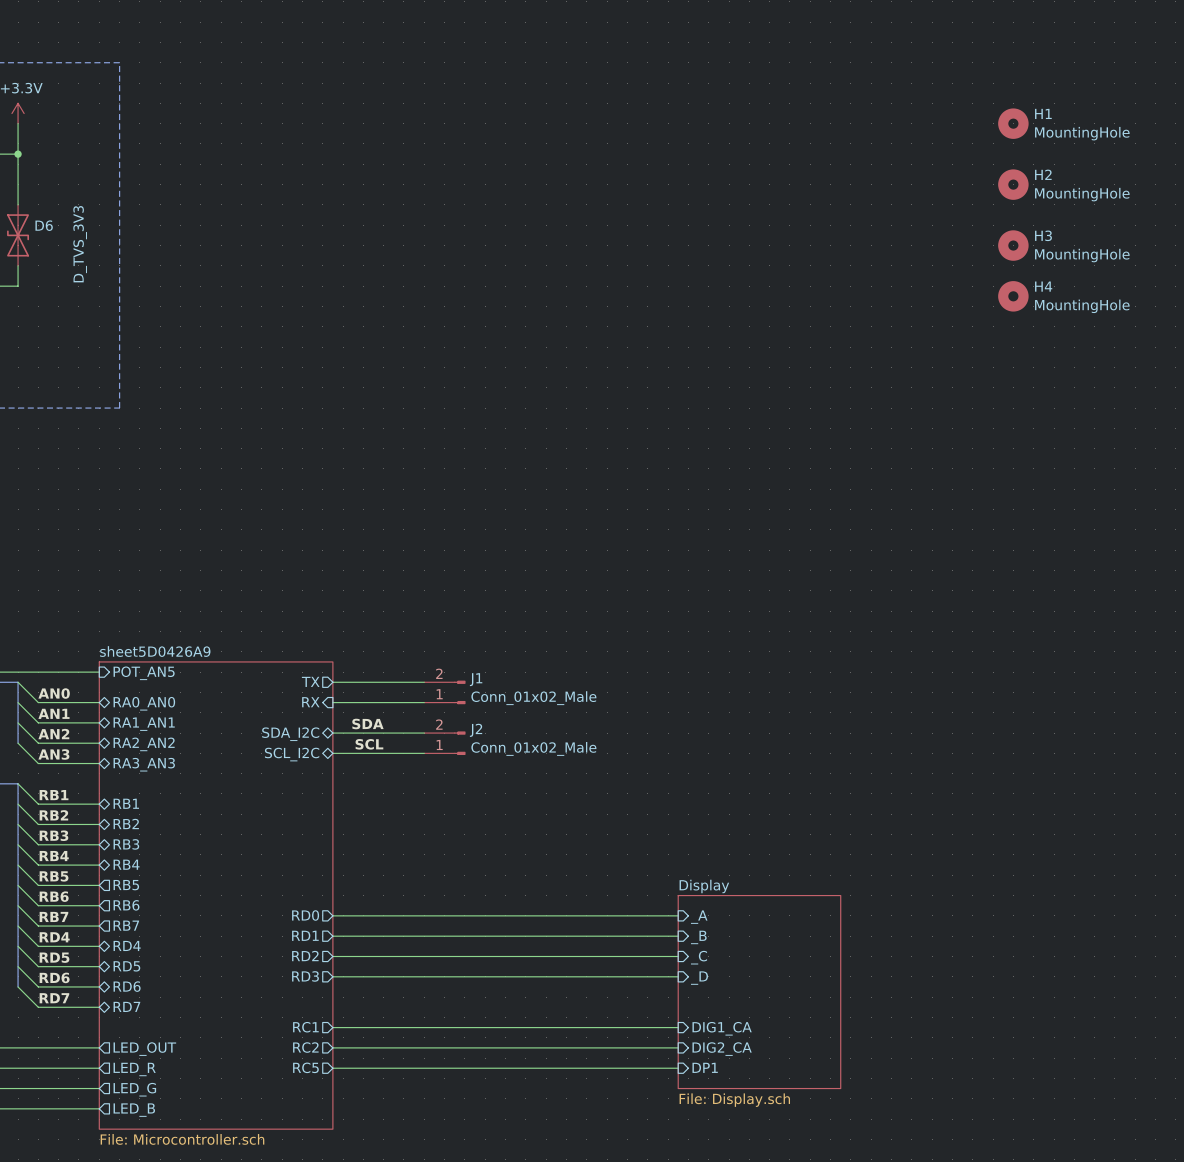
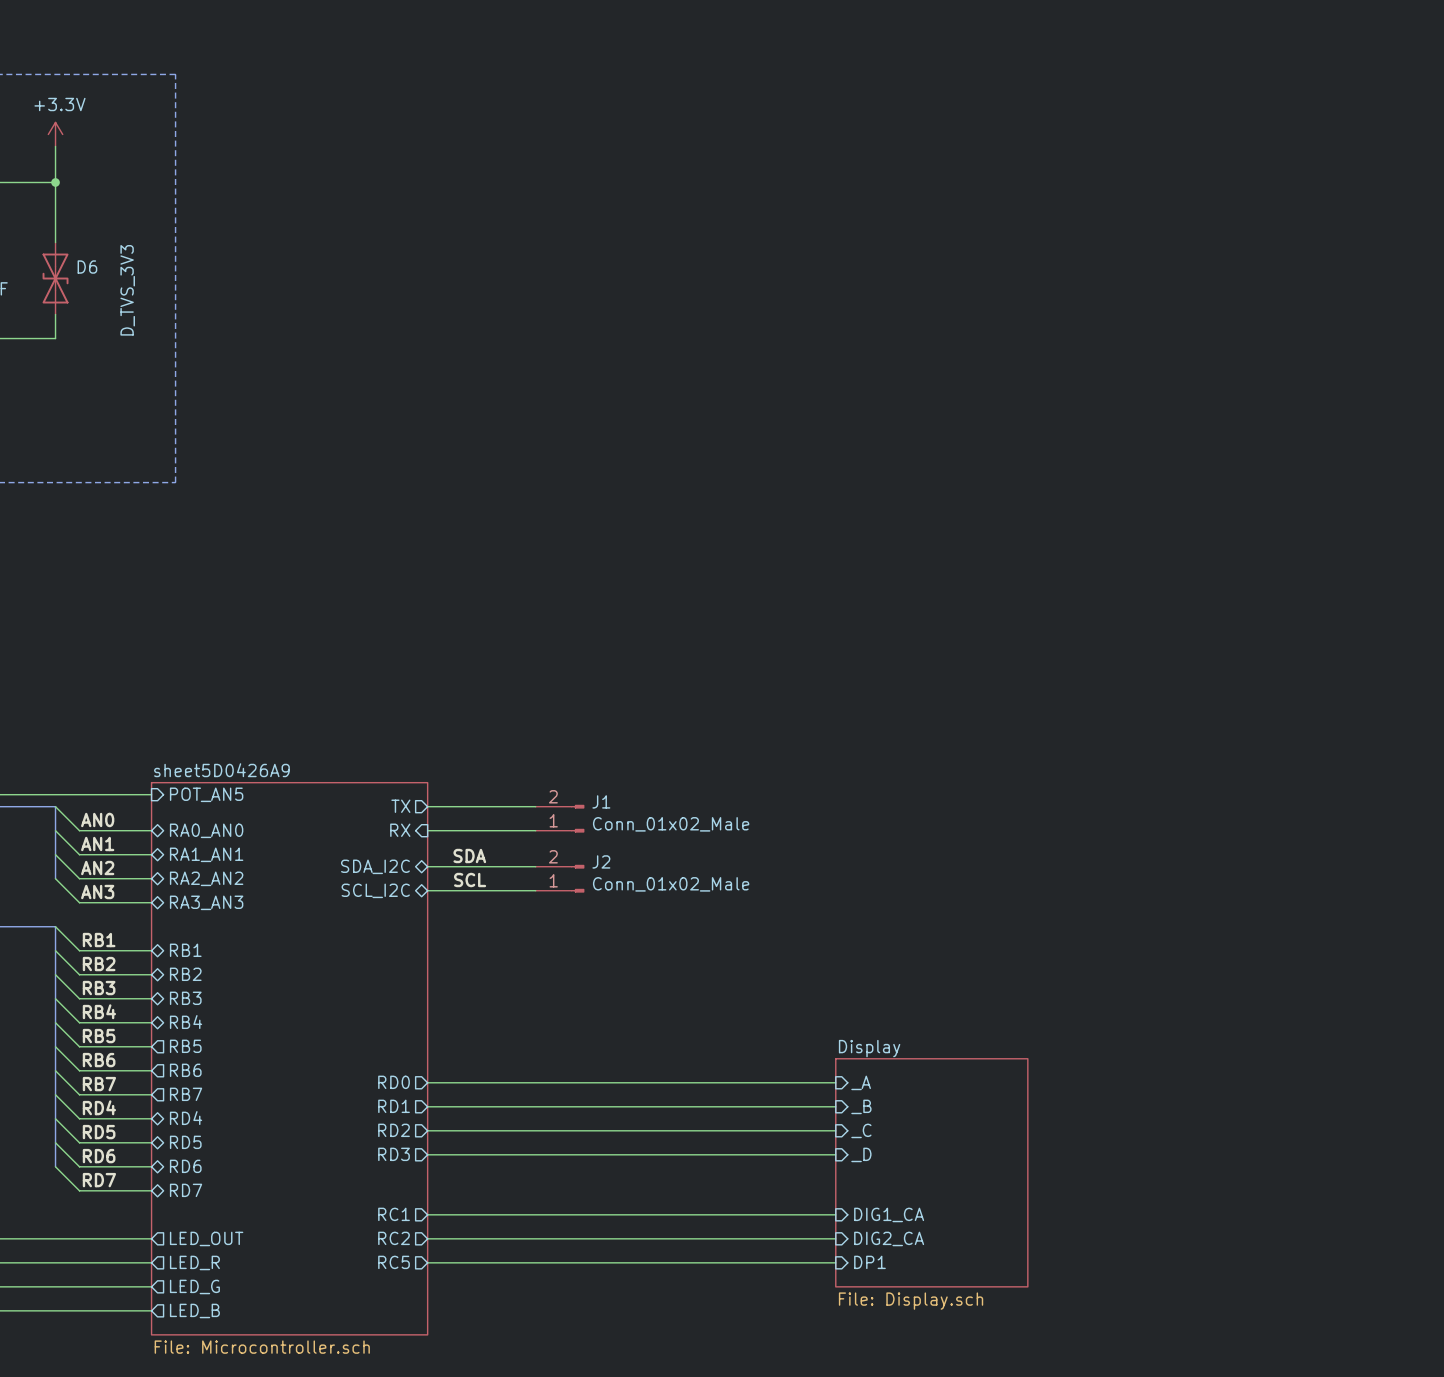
H1: MountingHole (1013, 123) -> none
H2: MountingHole (1013, 184) -> none
H3: MountingHole (1013, 245) -> none
H4: MountingHole (1013, 296) -> none

